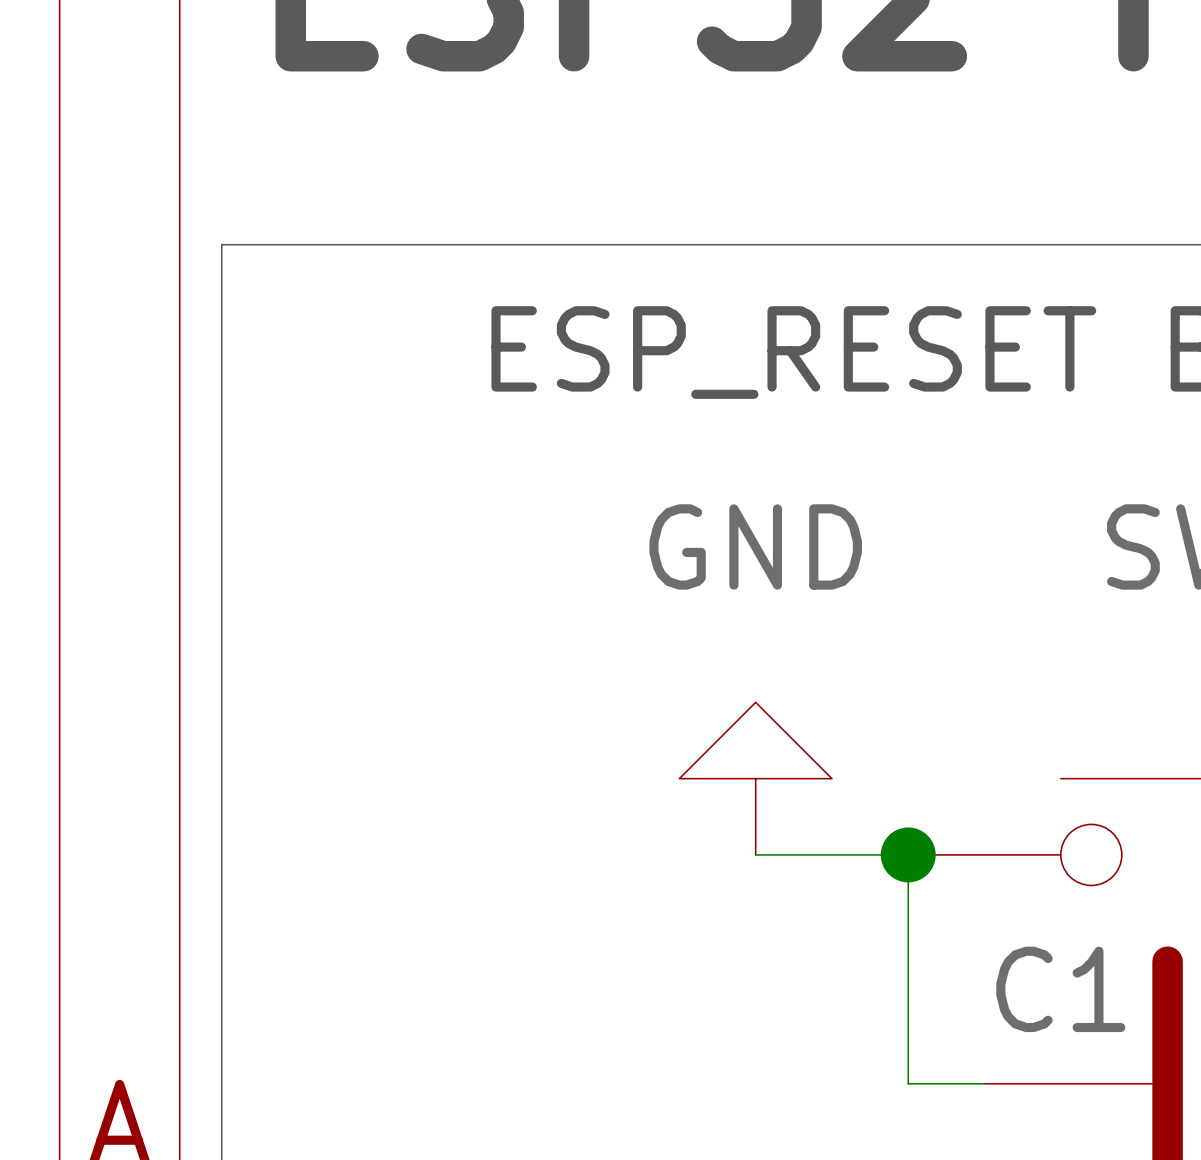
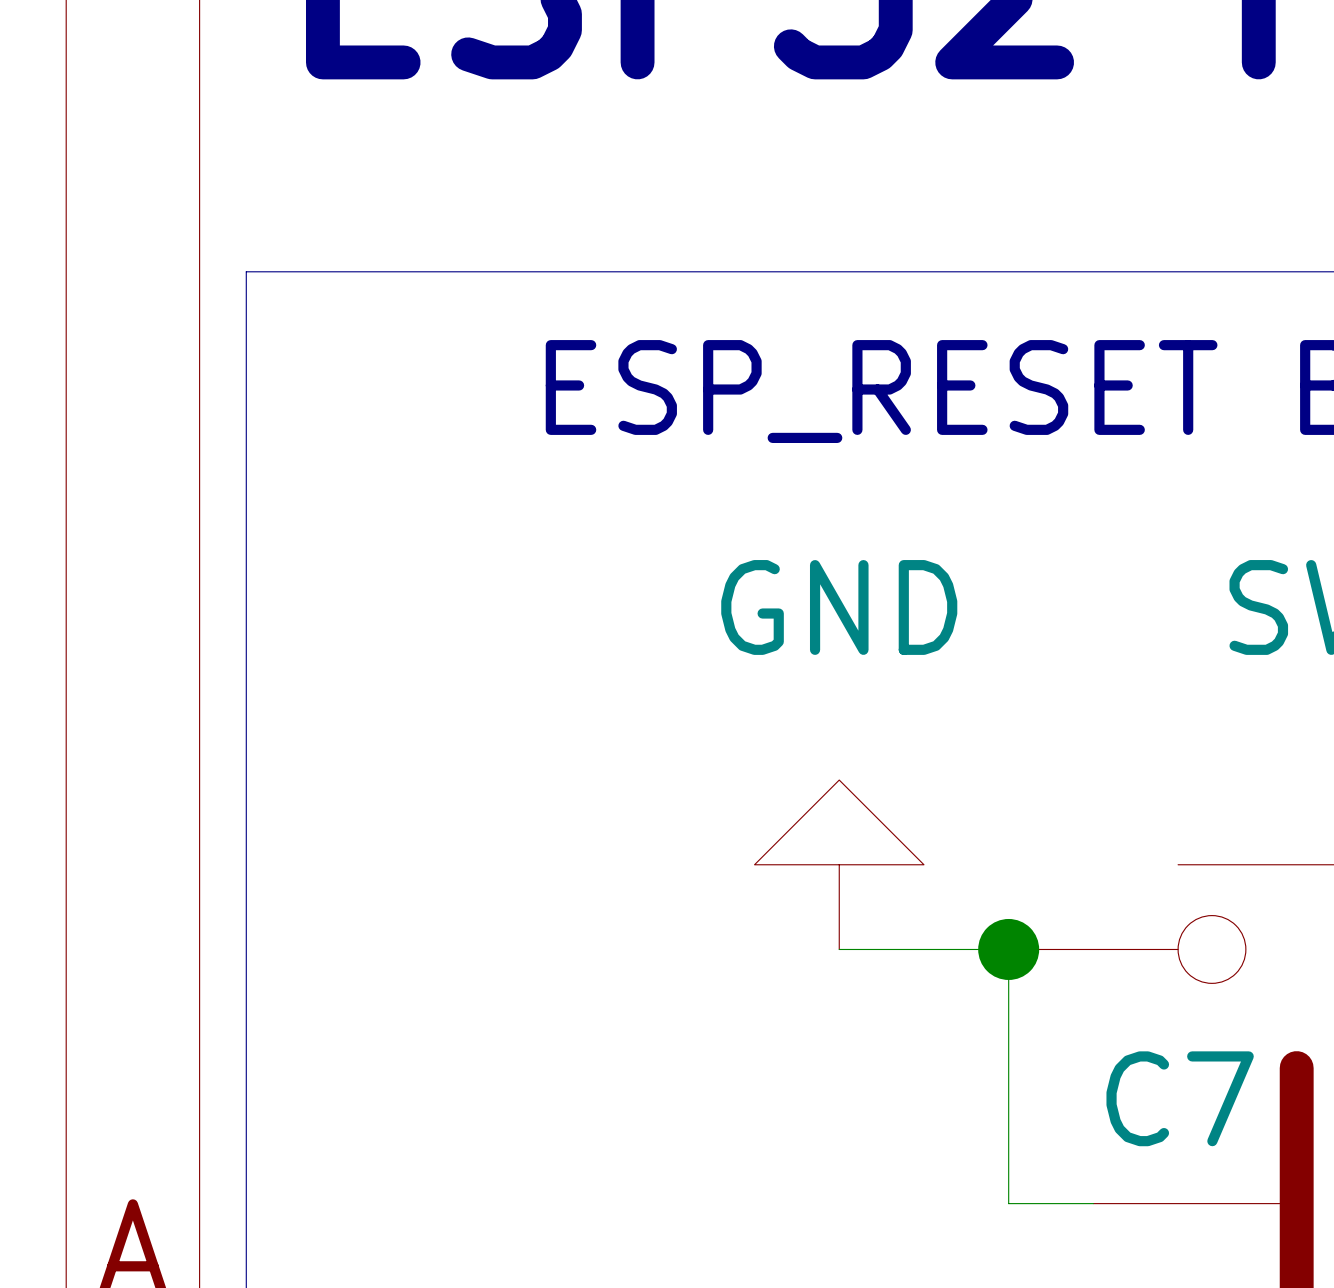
C1 name: C1 (1060, 989) -> C7 (1180, 1098)

